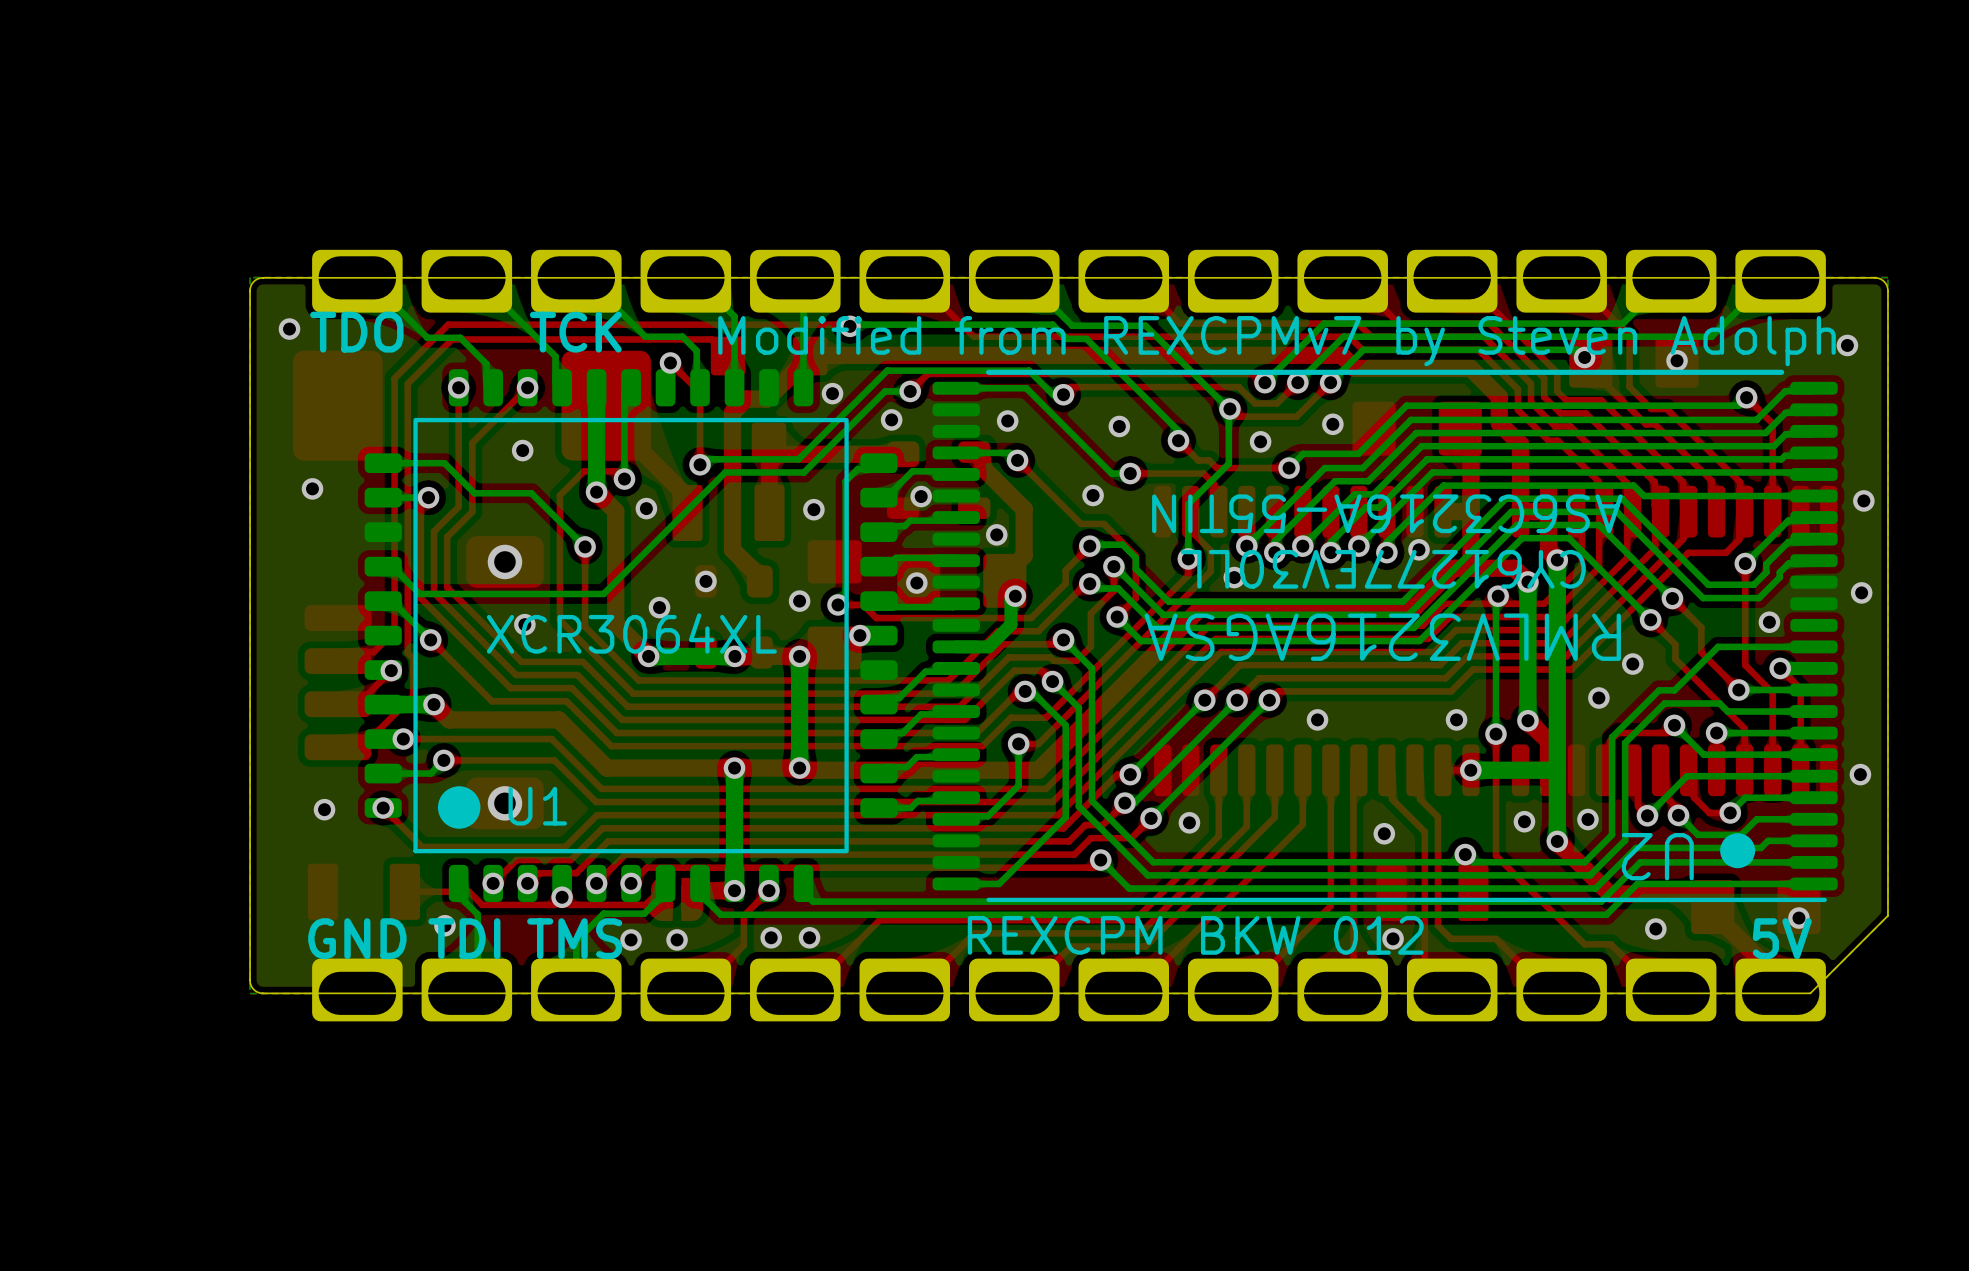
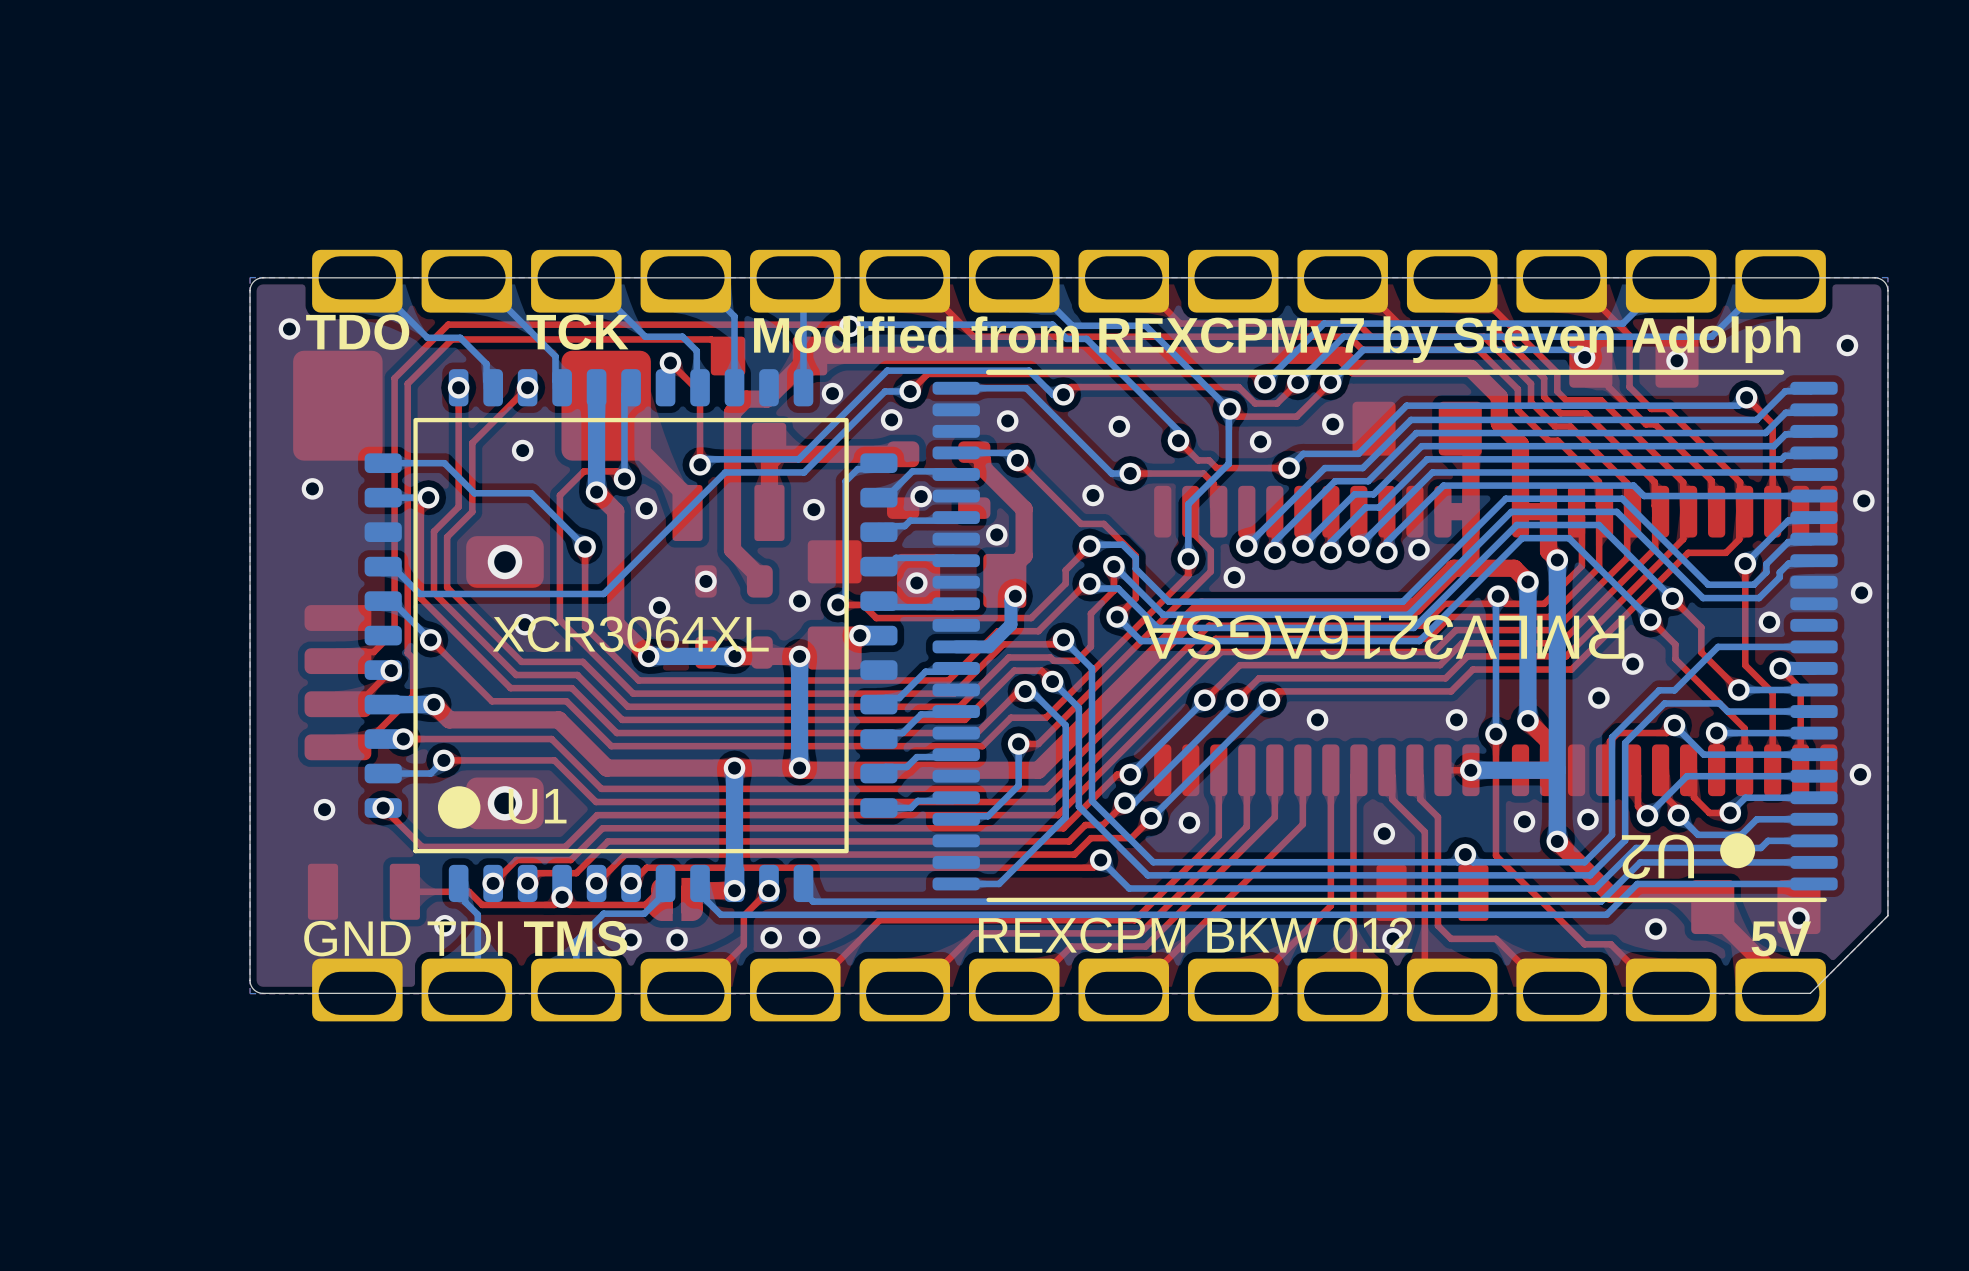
text: AS6C3216A-55TIN (1387, 513) -> none
text: CY61277EV30LL (1383, 569) -> none

